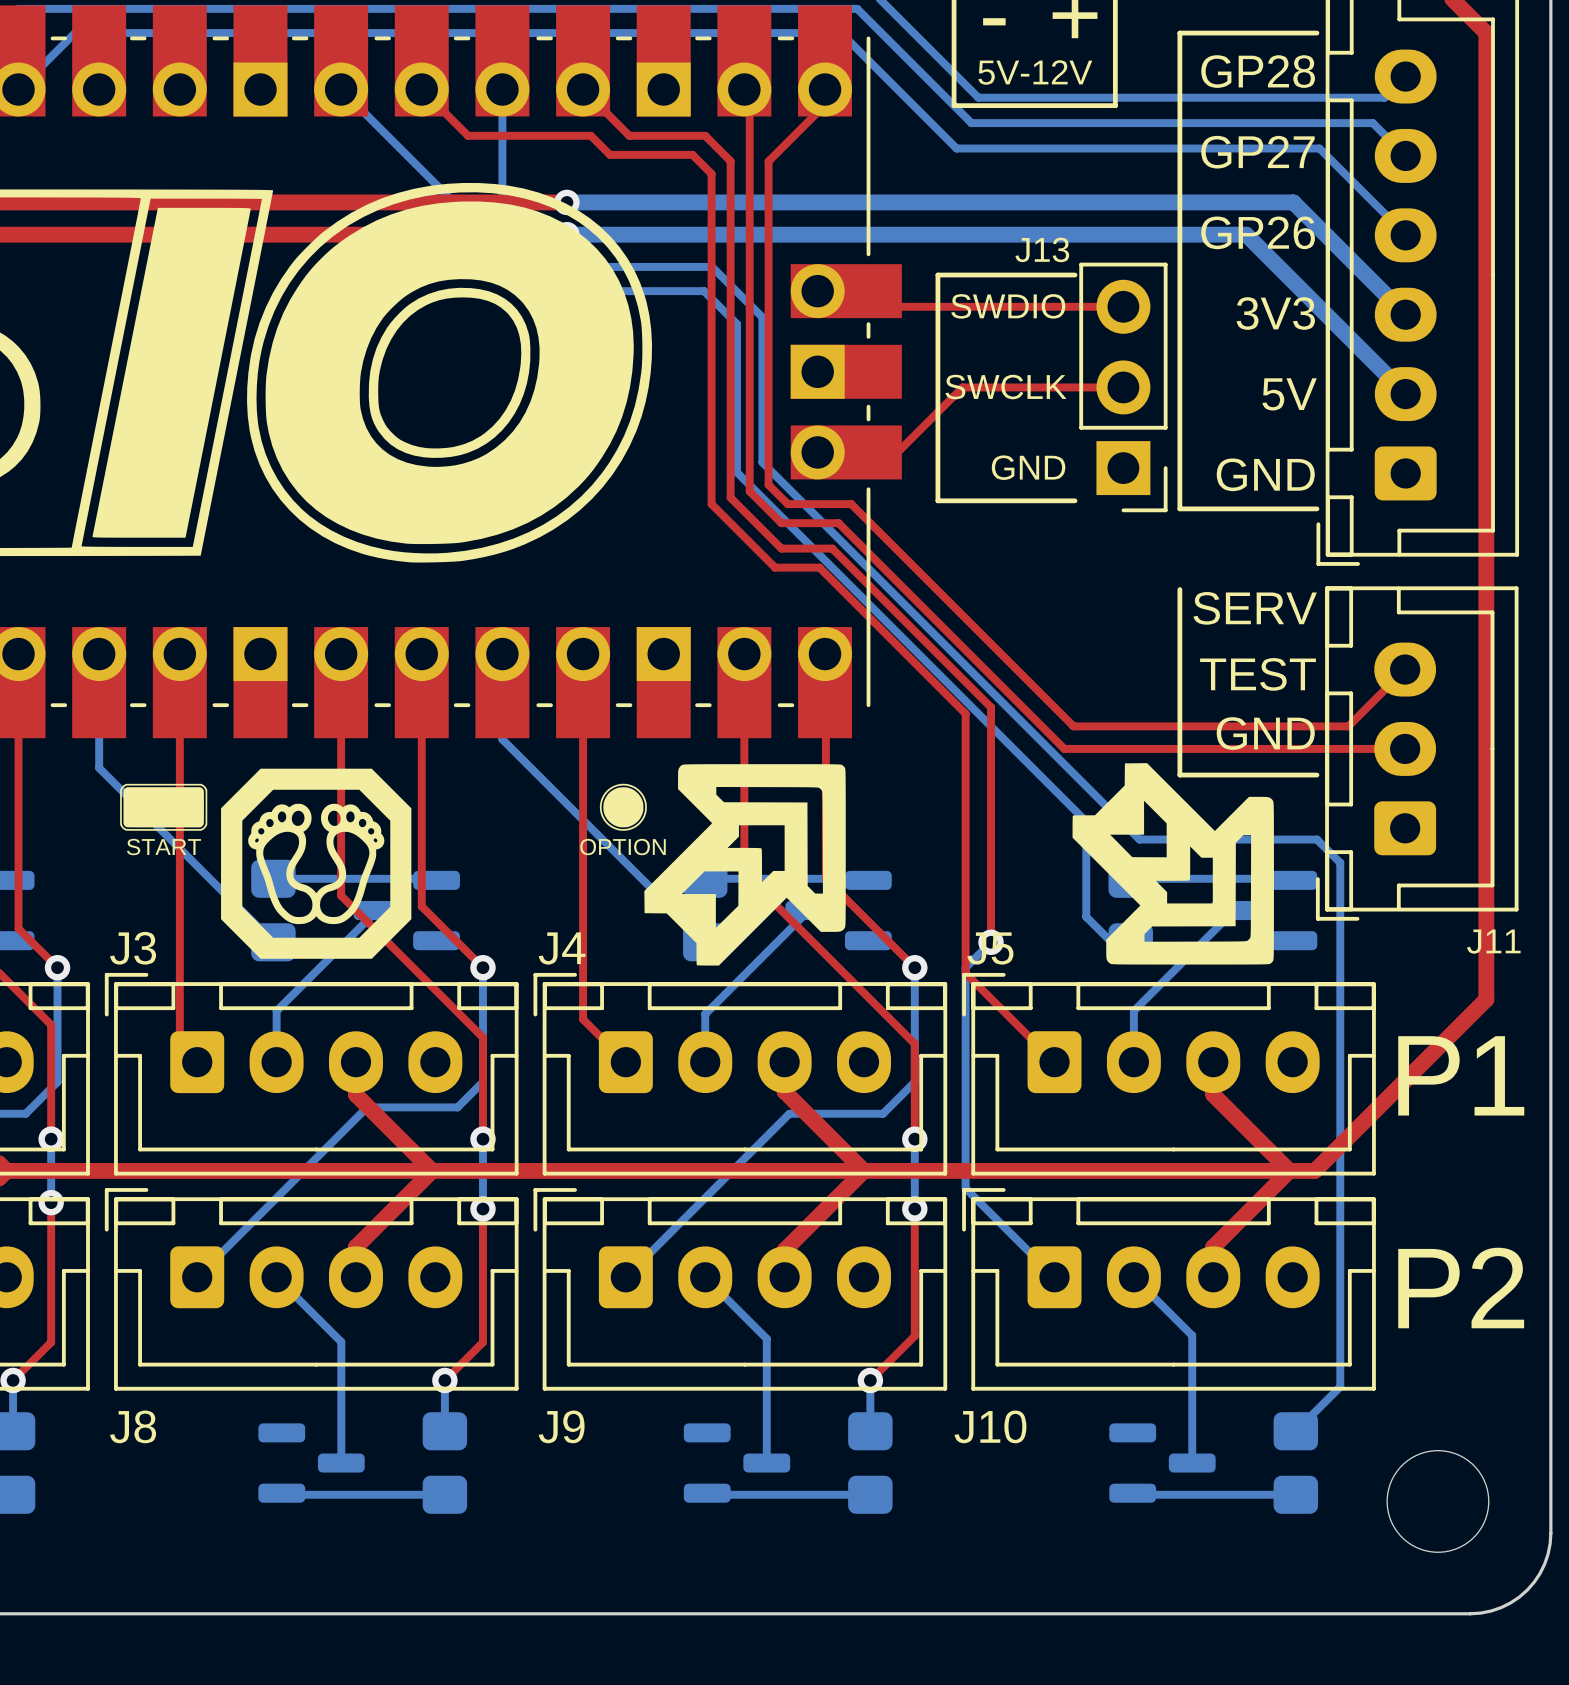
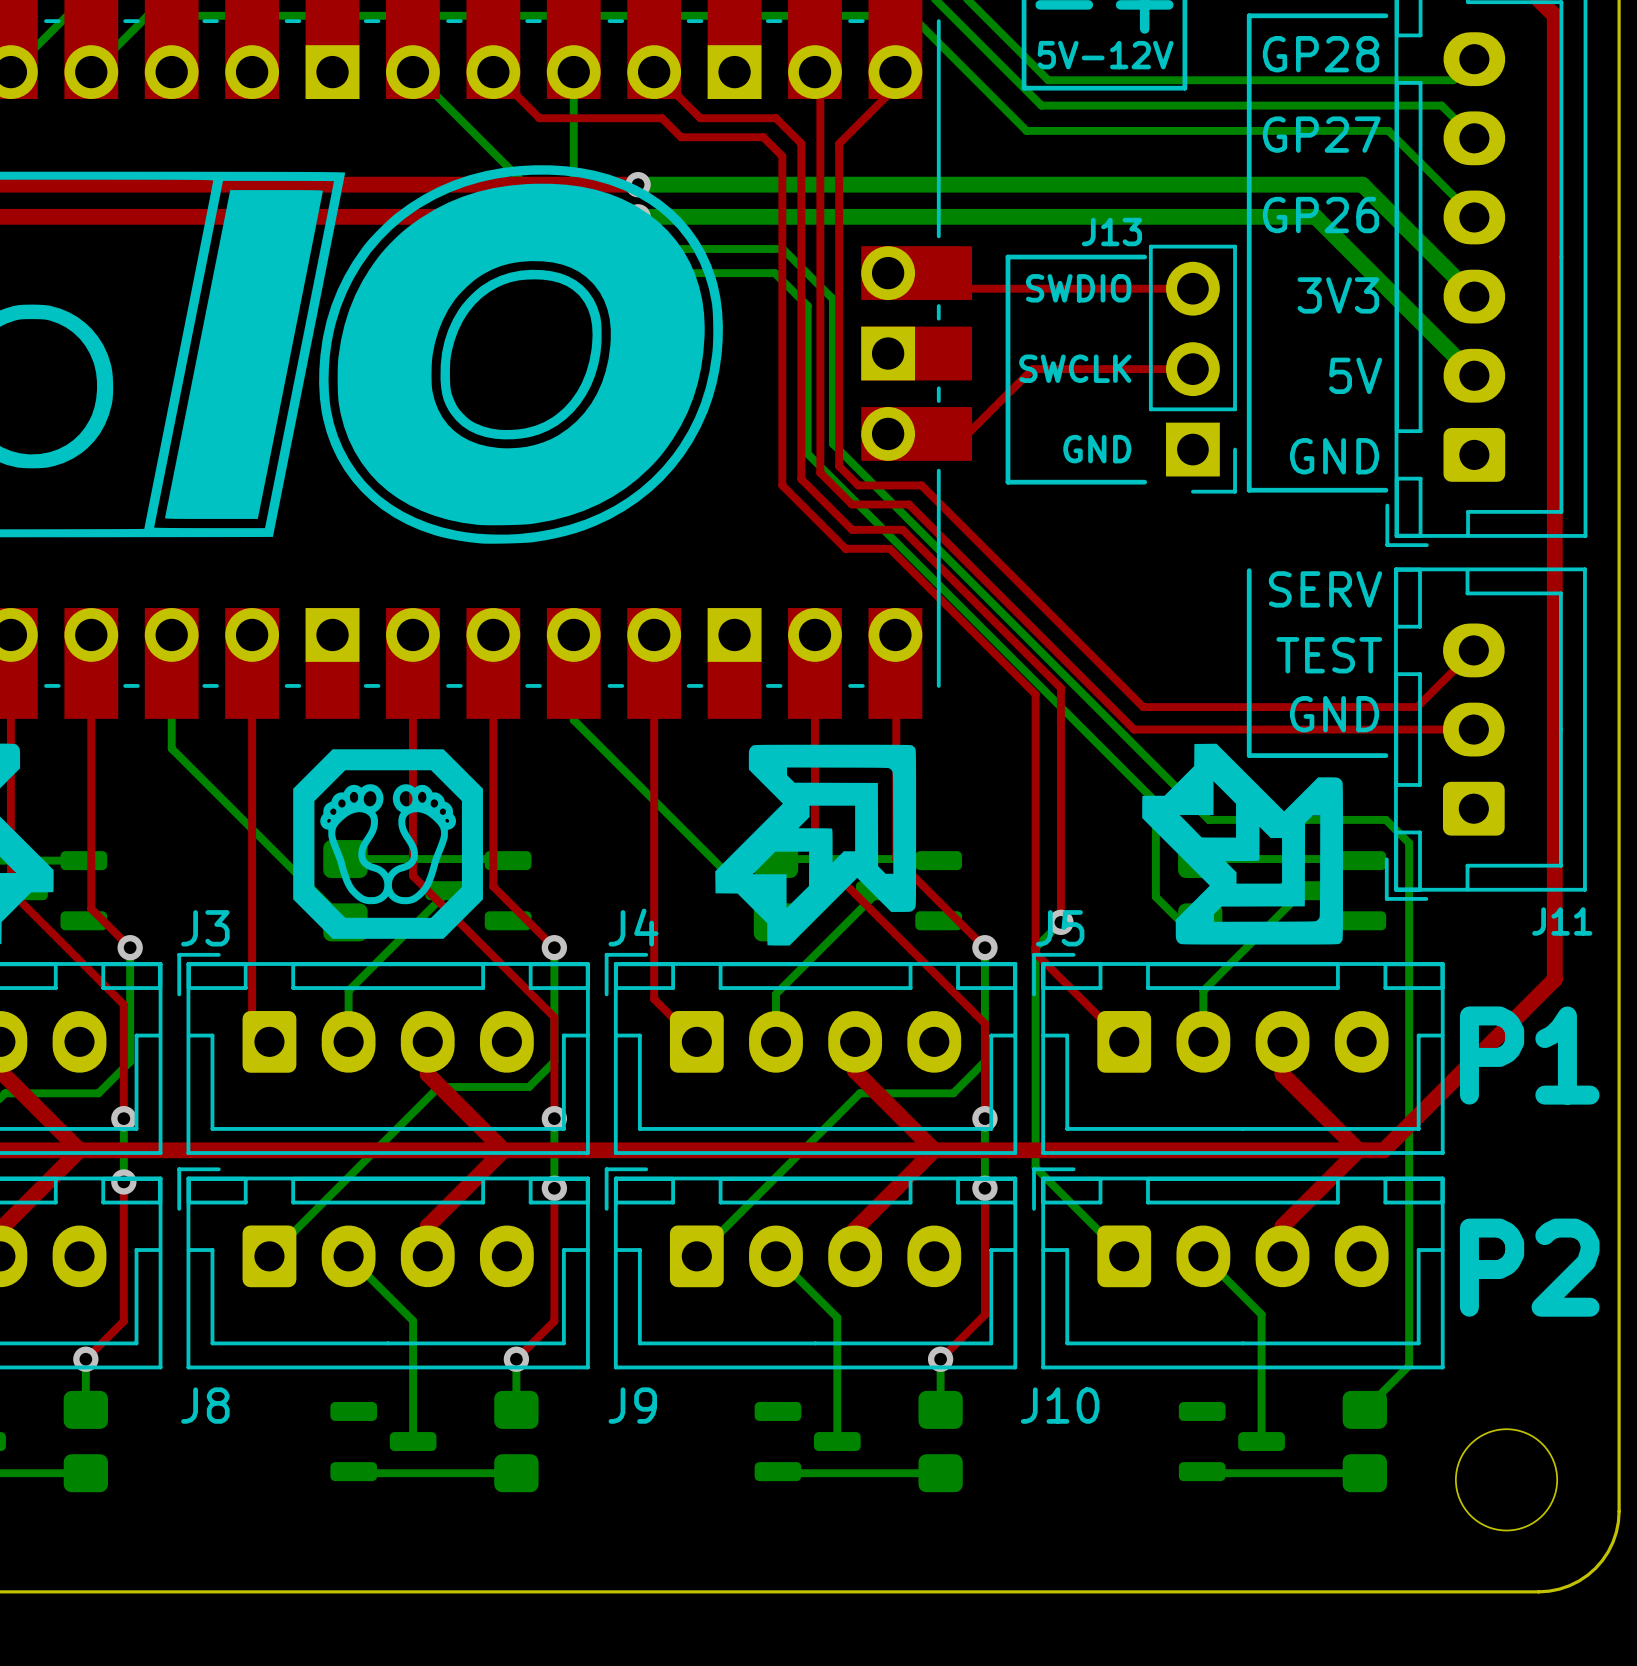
drawing: [120, 783, 208, 831] -> none
drawing: [599, 783, 647, 831] -> none
text: START (163, 847) -> none
text: OPTION (623, 847) -> none

